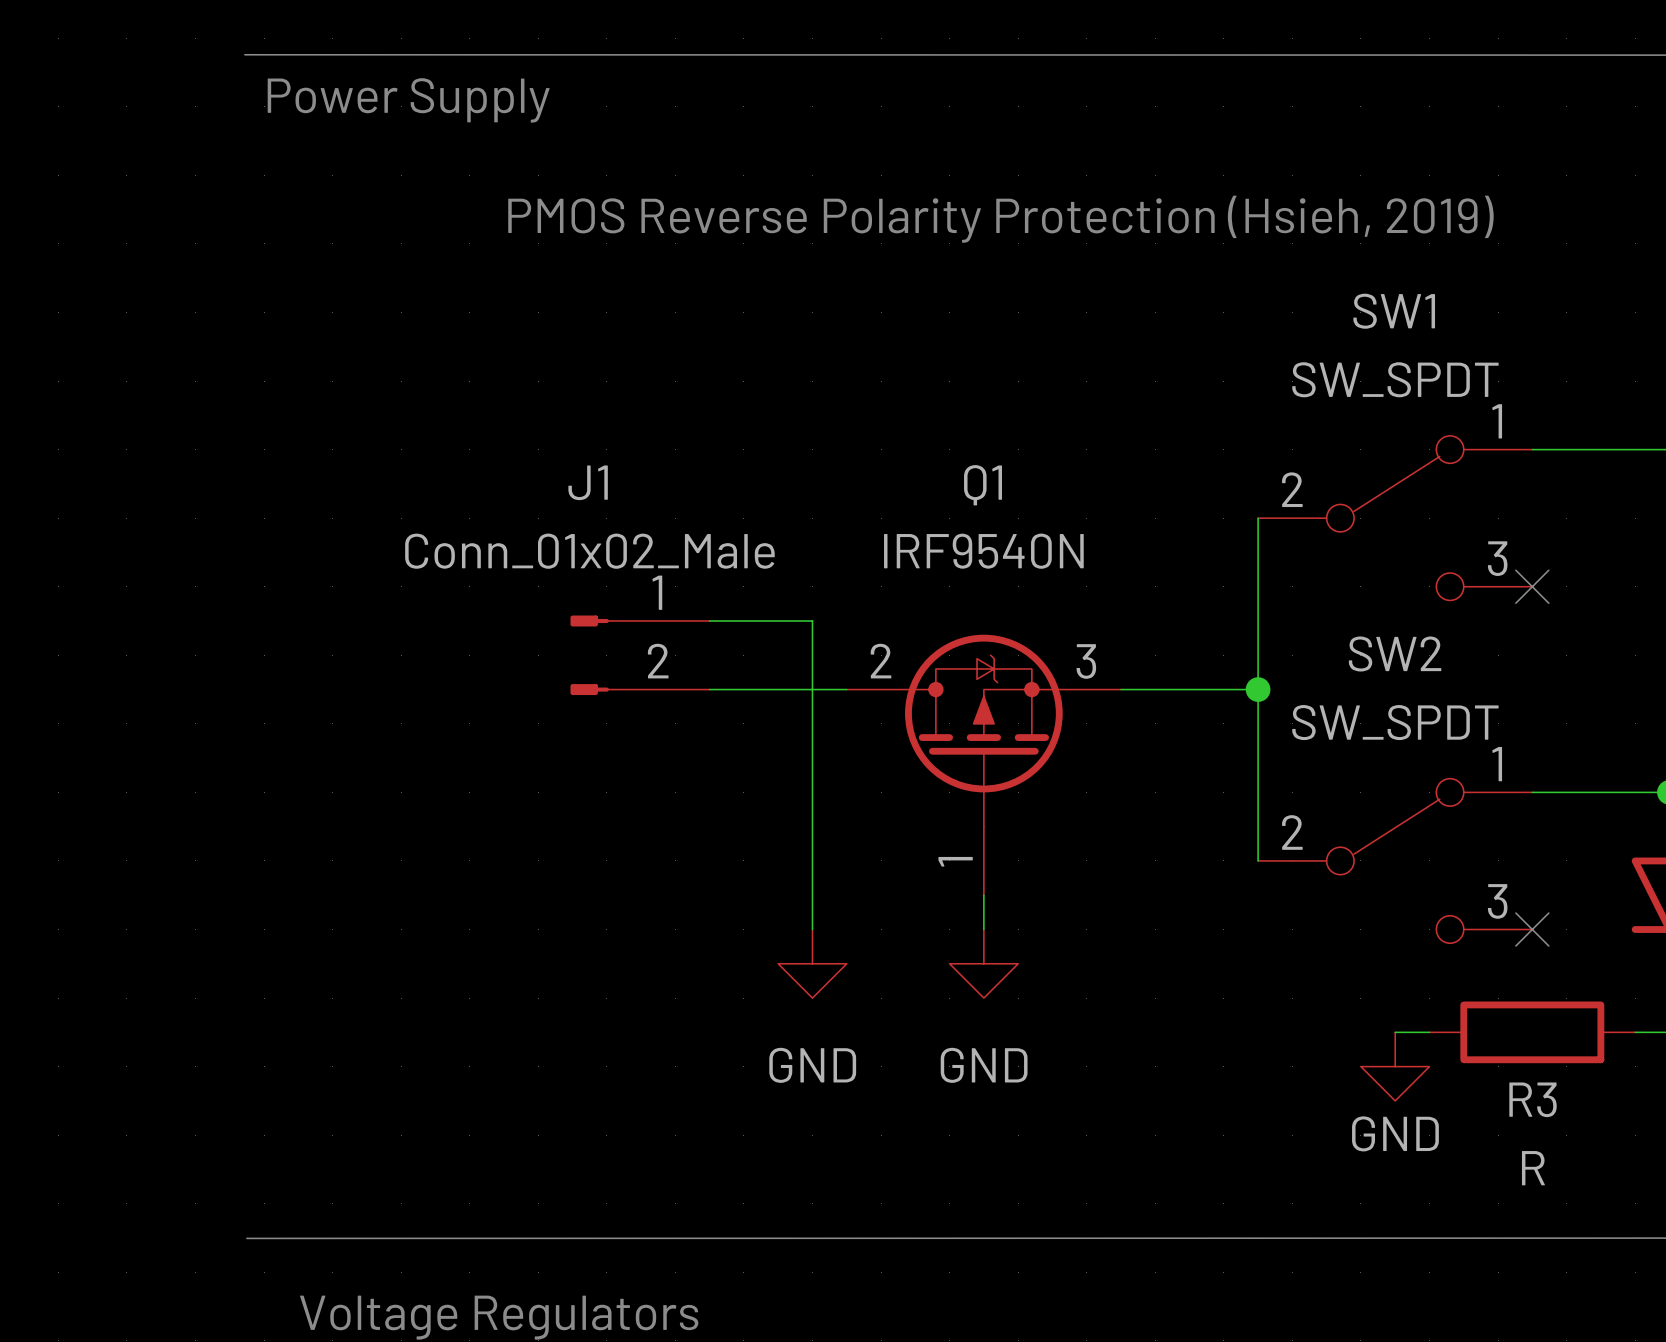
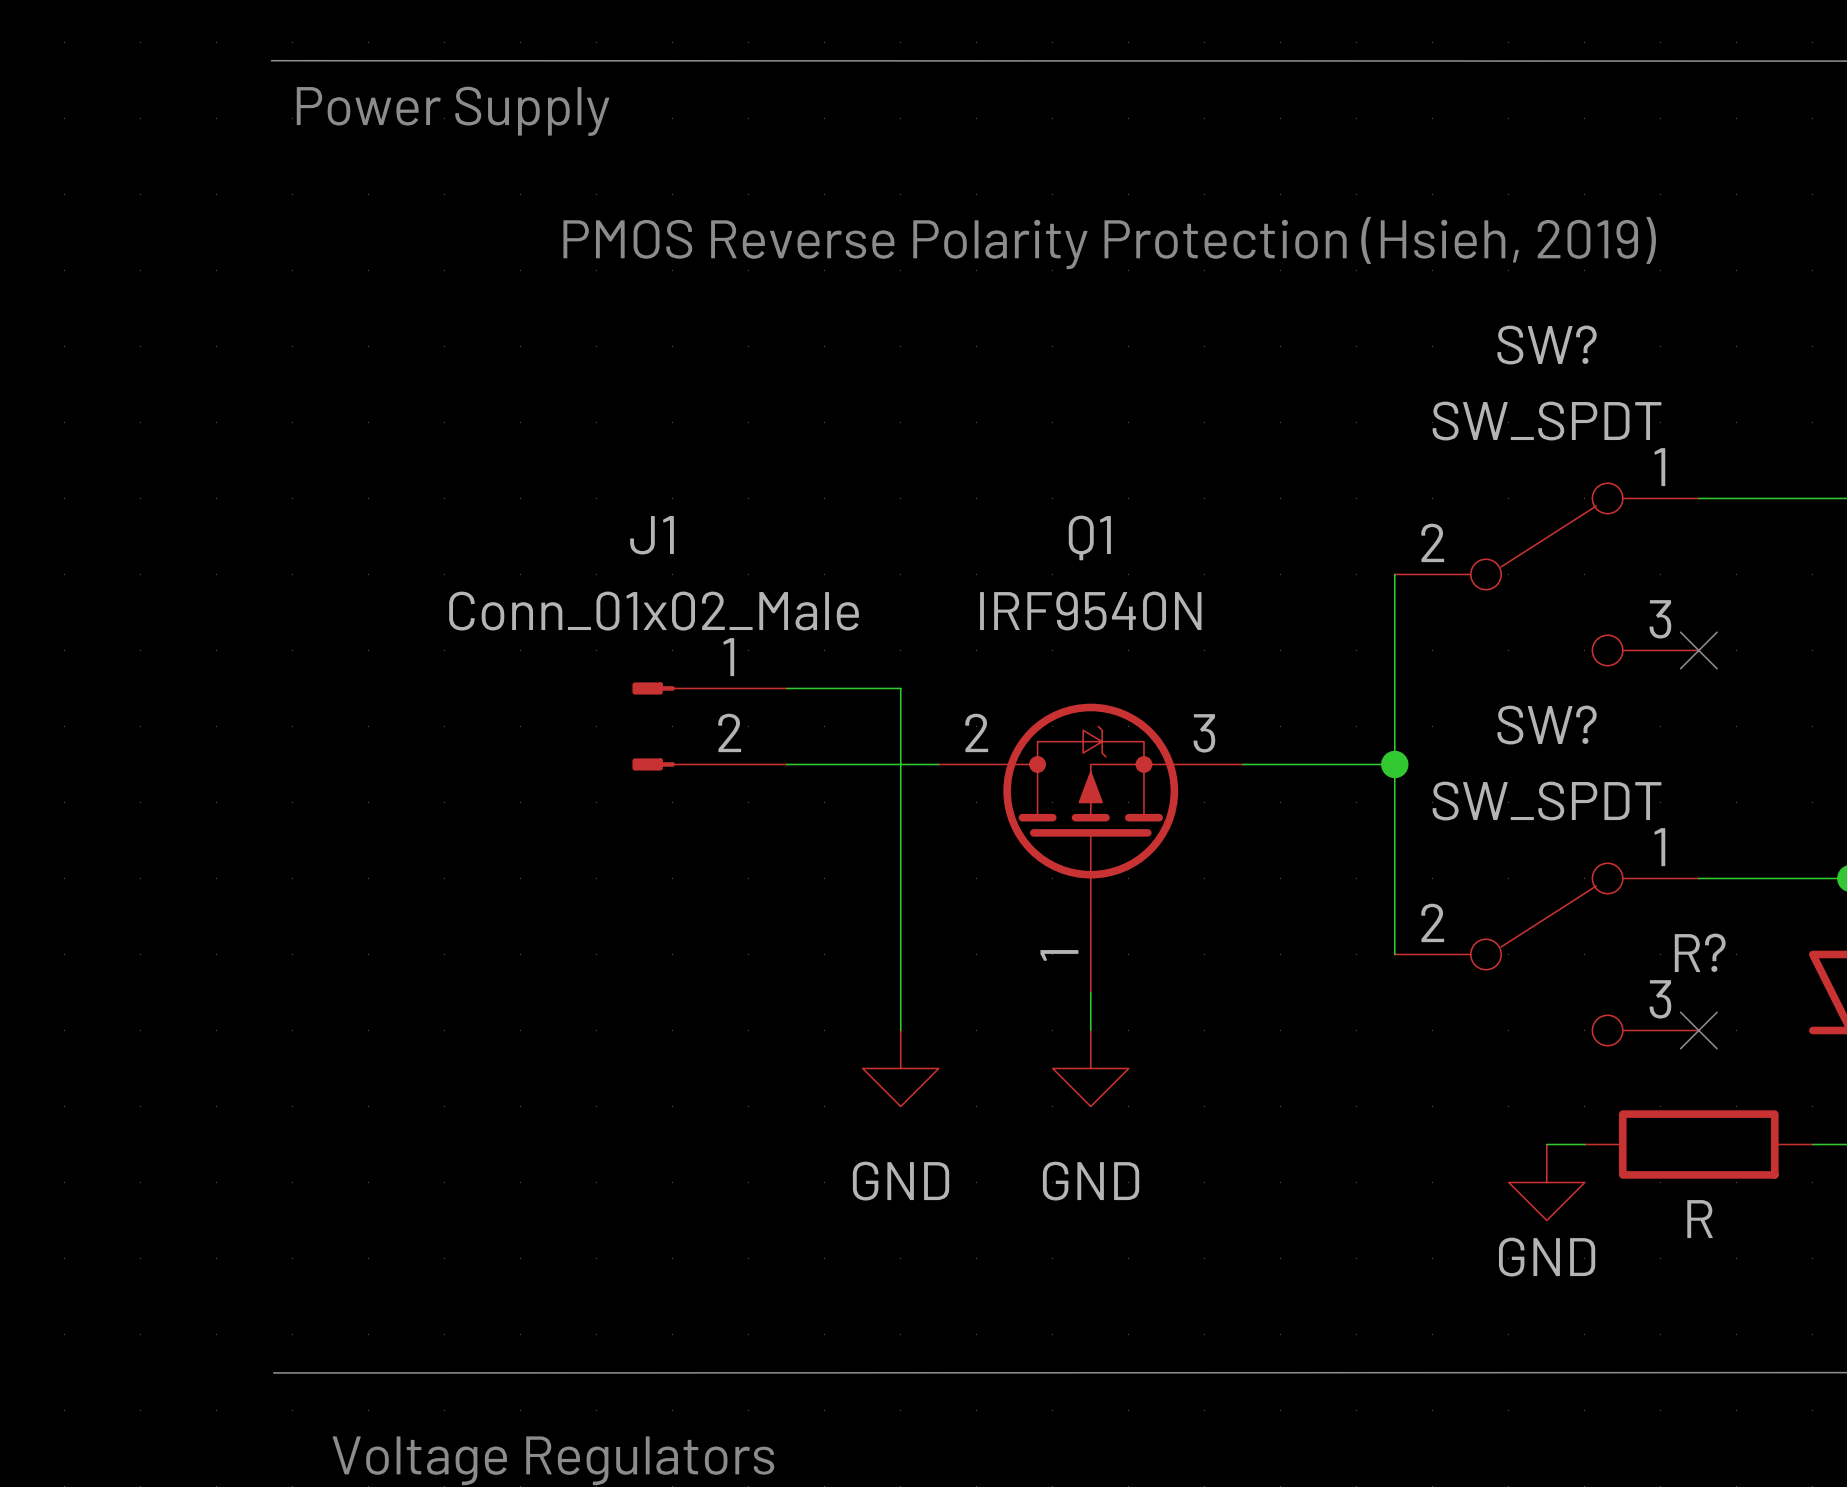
SW1 name: SW1 (1394, 311) -> SW? (1547, 345)
SW2 name: SW2 (1395, 654) -> SW? (1547, 725)
R3 name: R3 (1533, 1099) -> R? (1700, 952)
R3 value position: R (1533, 1168) -> R (1700, 1219)

